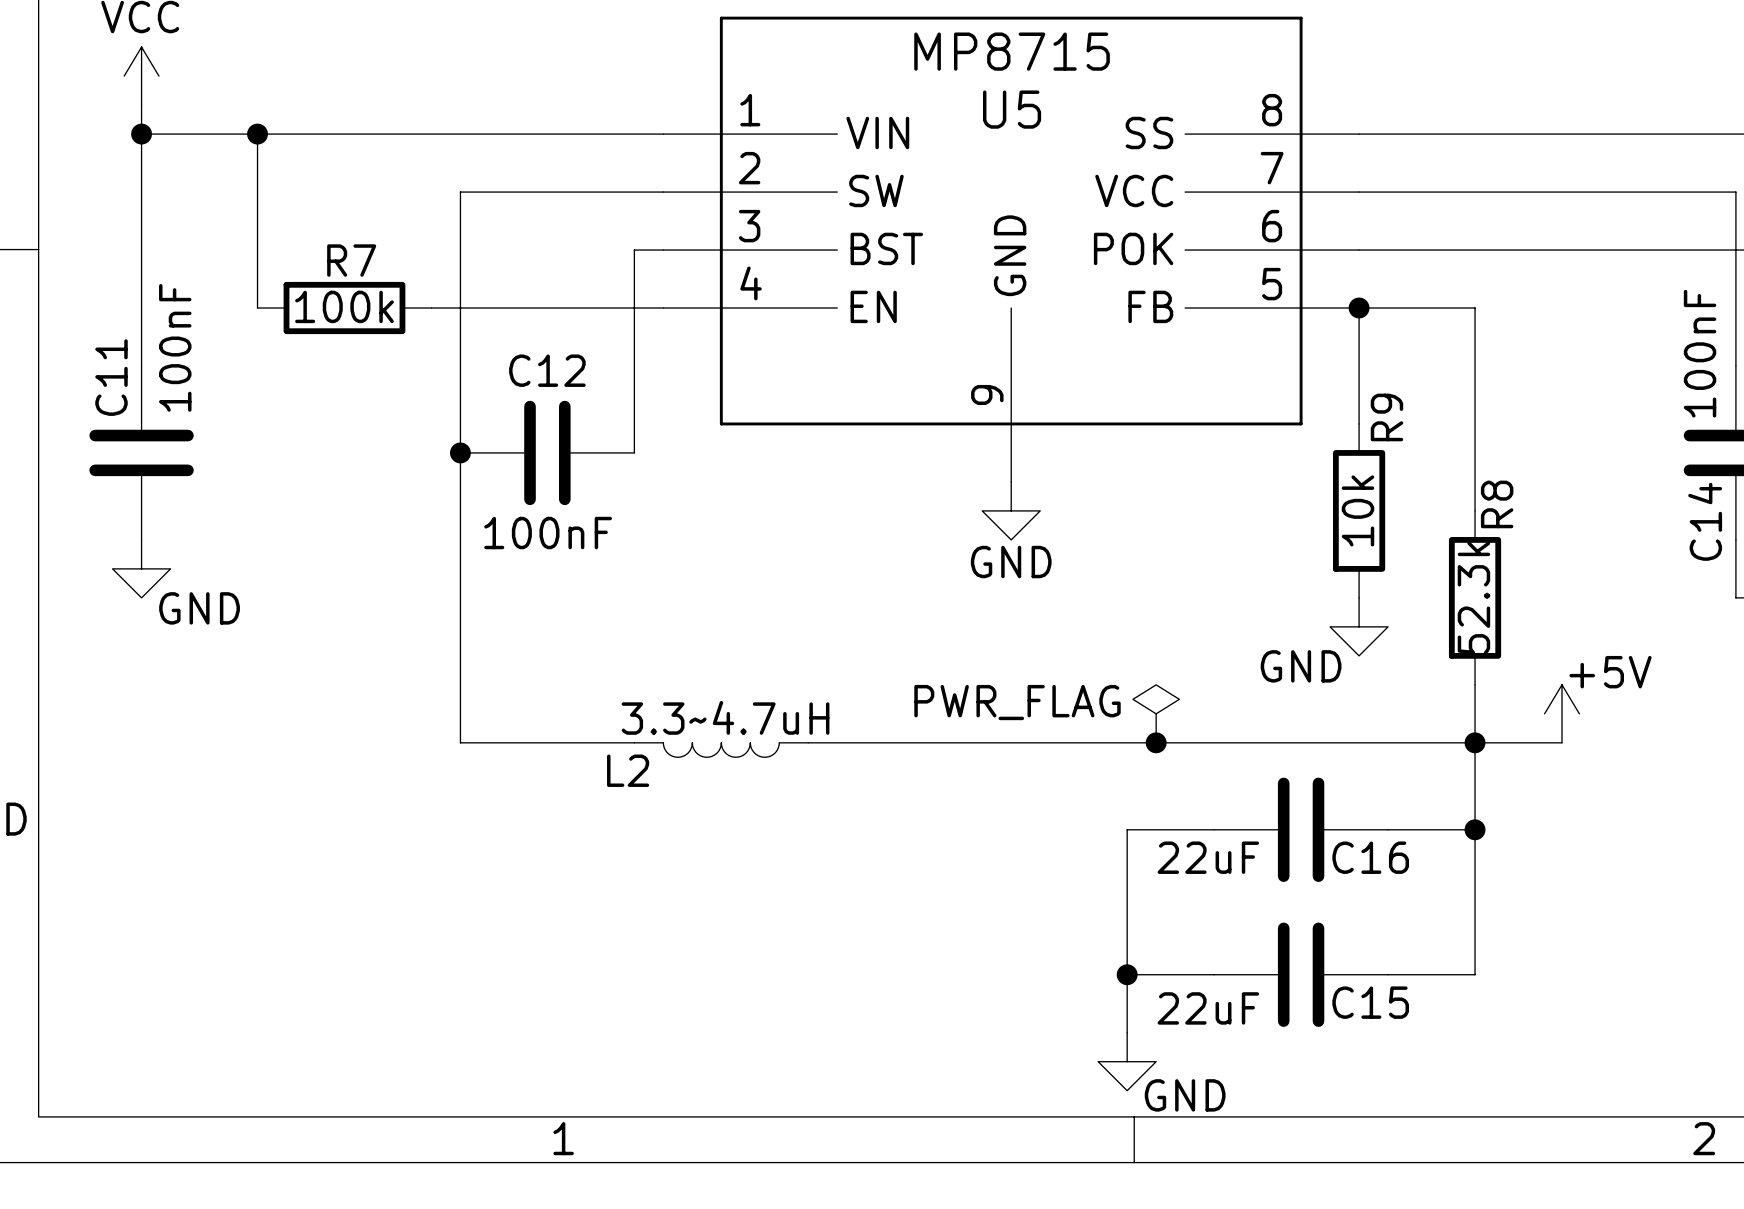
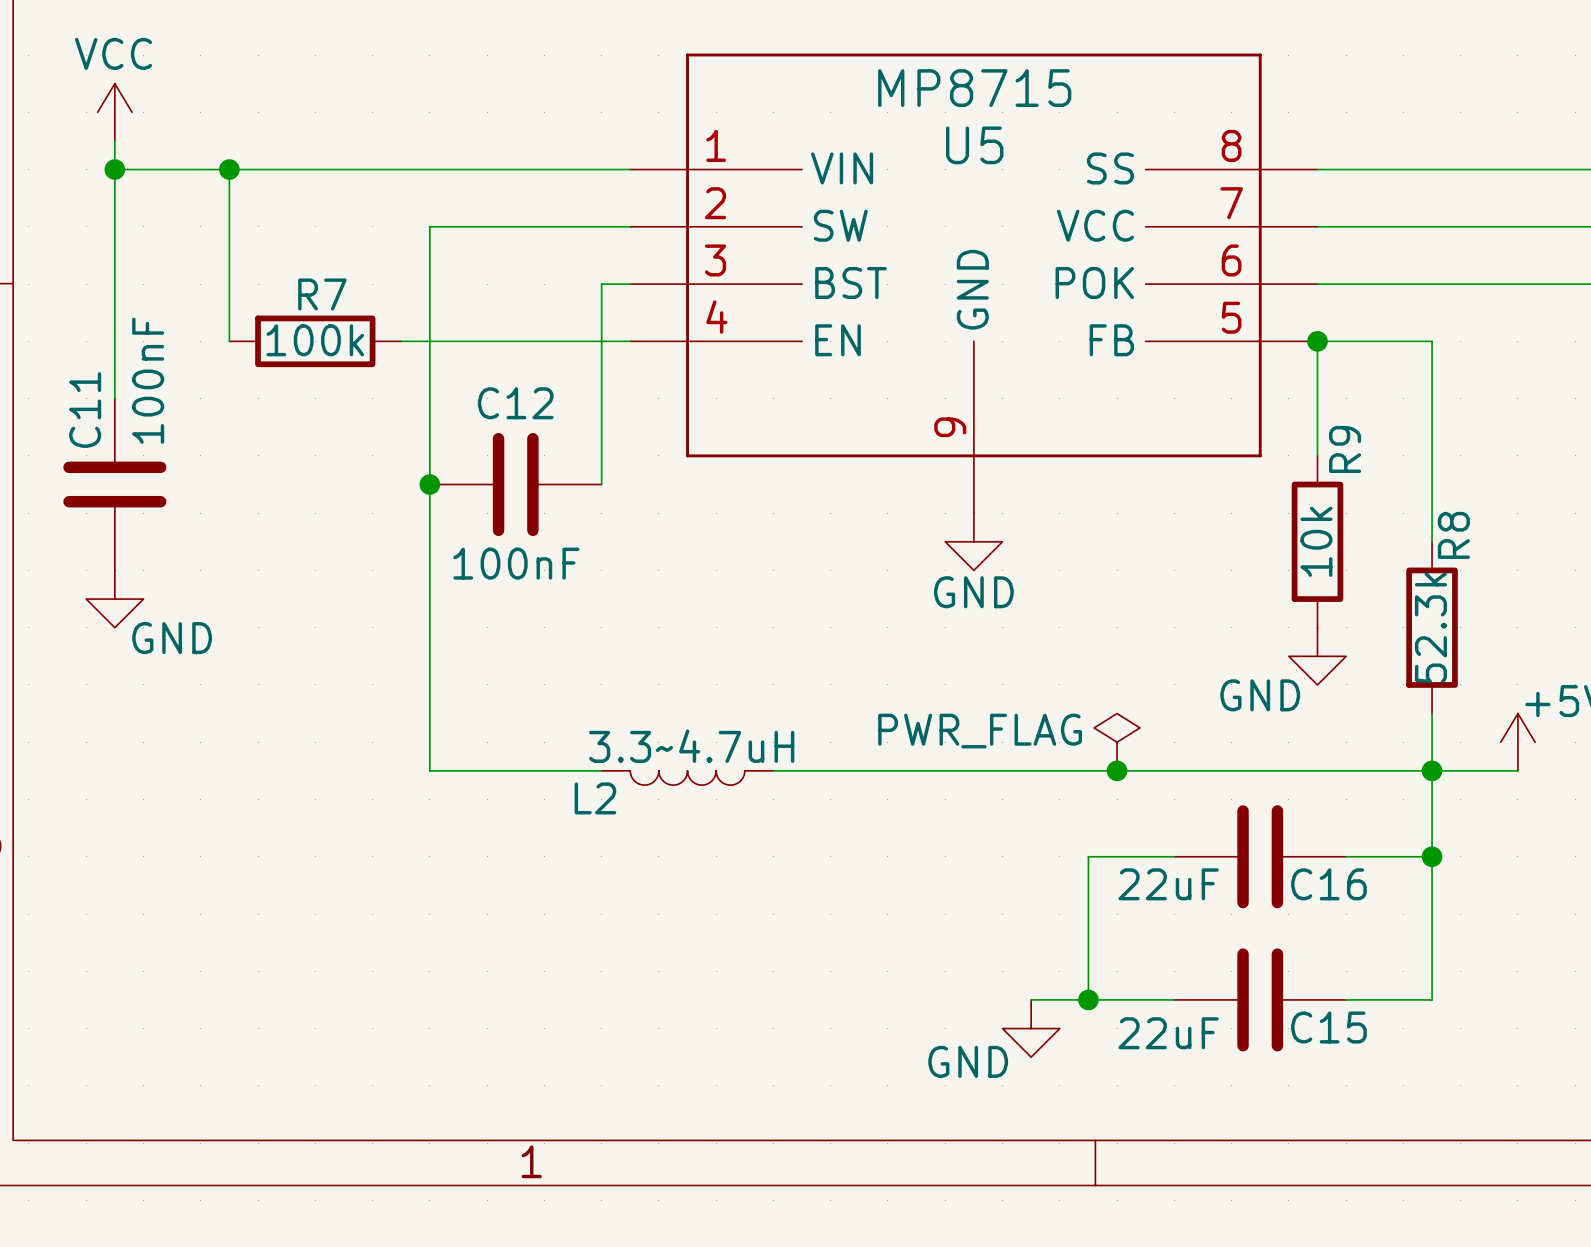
wire: (1127, 974) (1127, 1032) -> (1088, 999) (1031, 999)
power symbol position: GND (1127, 1061) -> GND (1031, 1028)
power symbol text position: GND (1185, 1095) -> GND (968, 1061)

